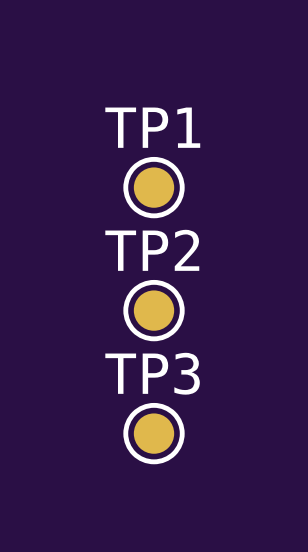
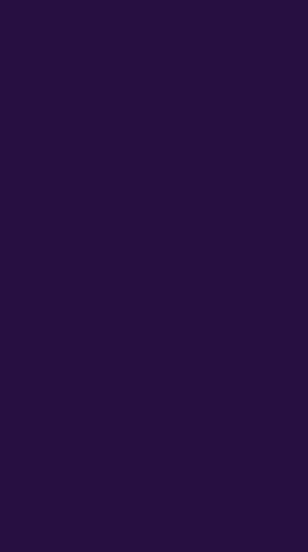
TP1: (154, 187) -> none
TP2: (154, 310) -> none
TP3: (154, 433) -> none

